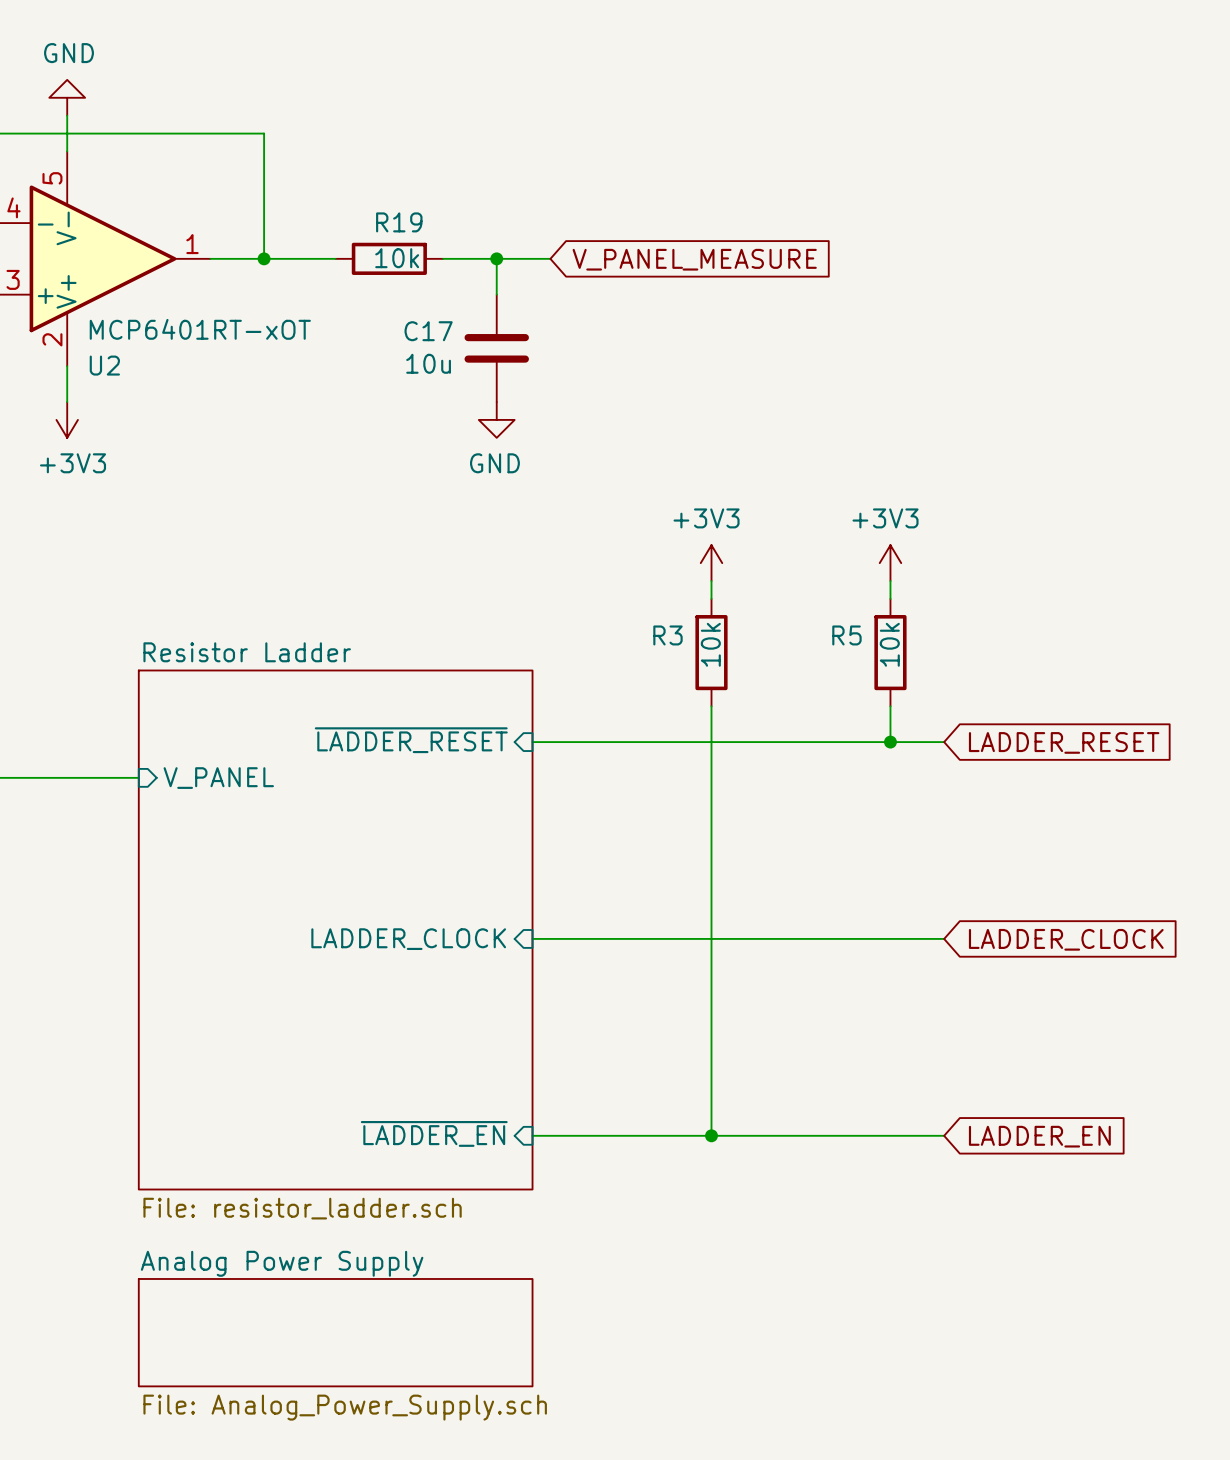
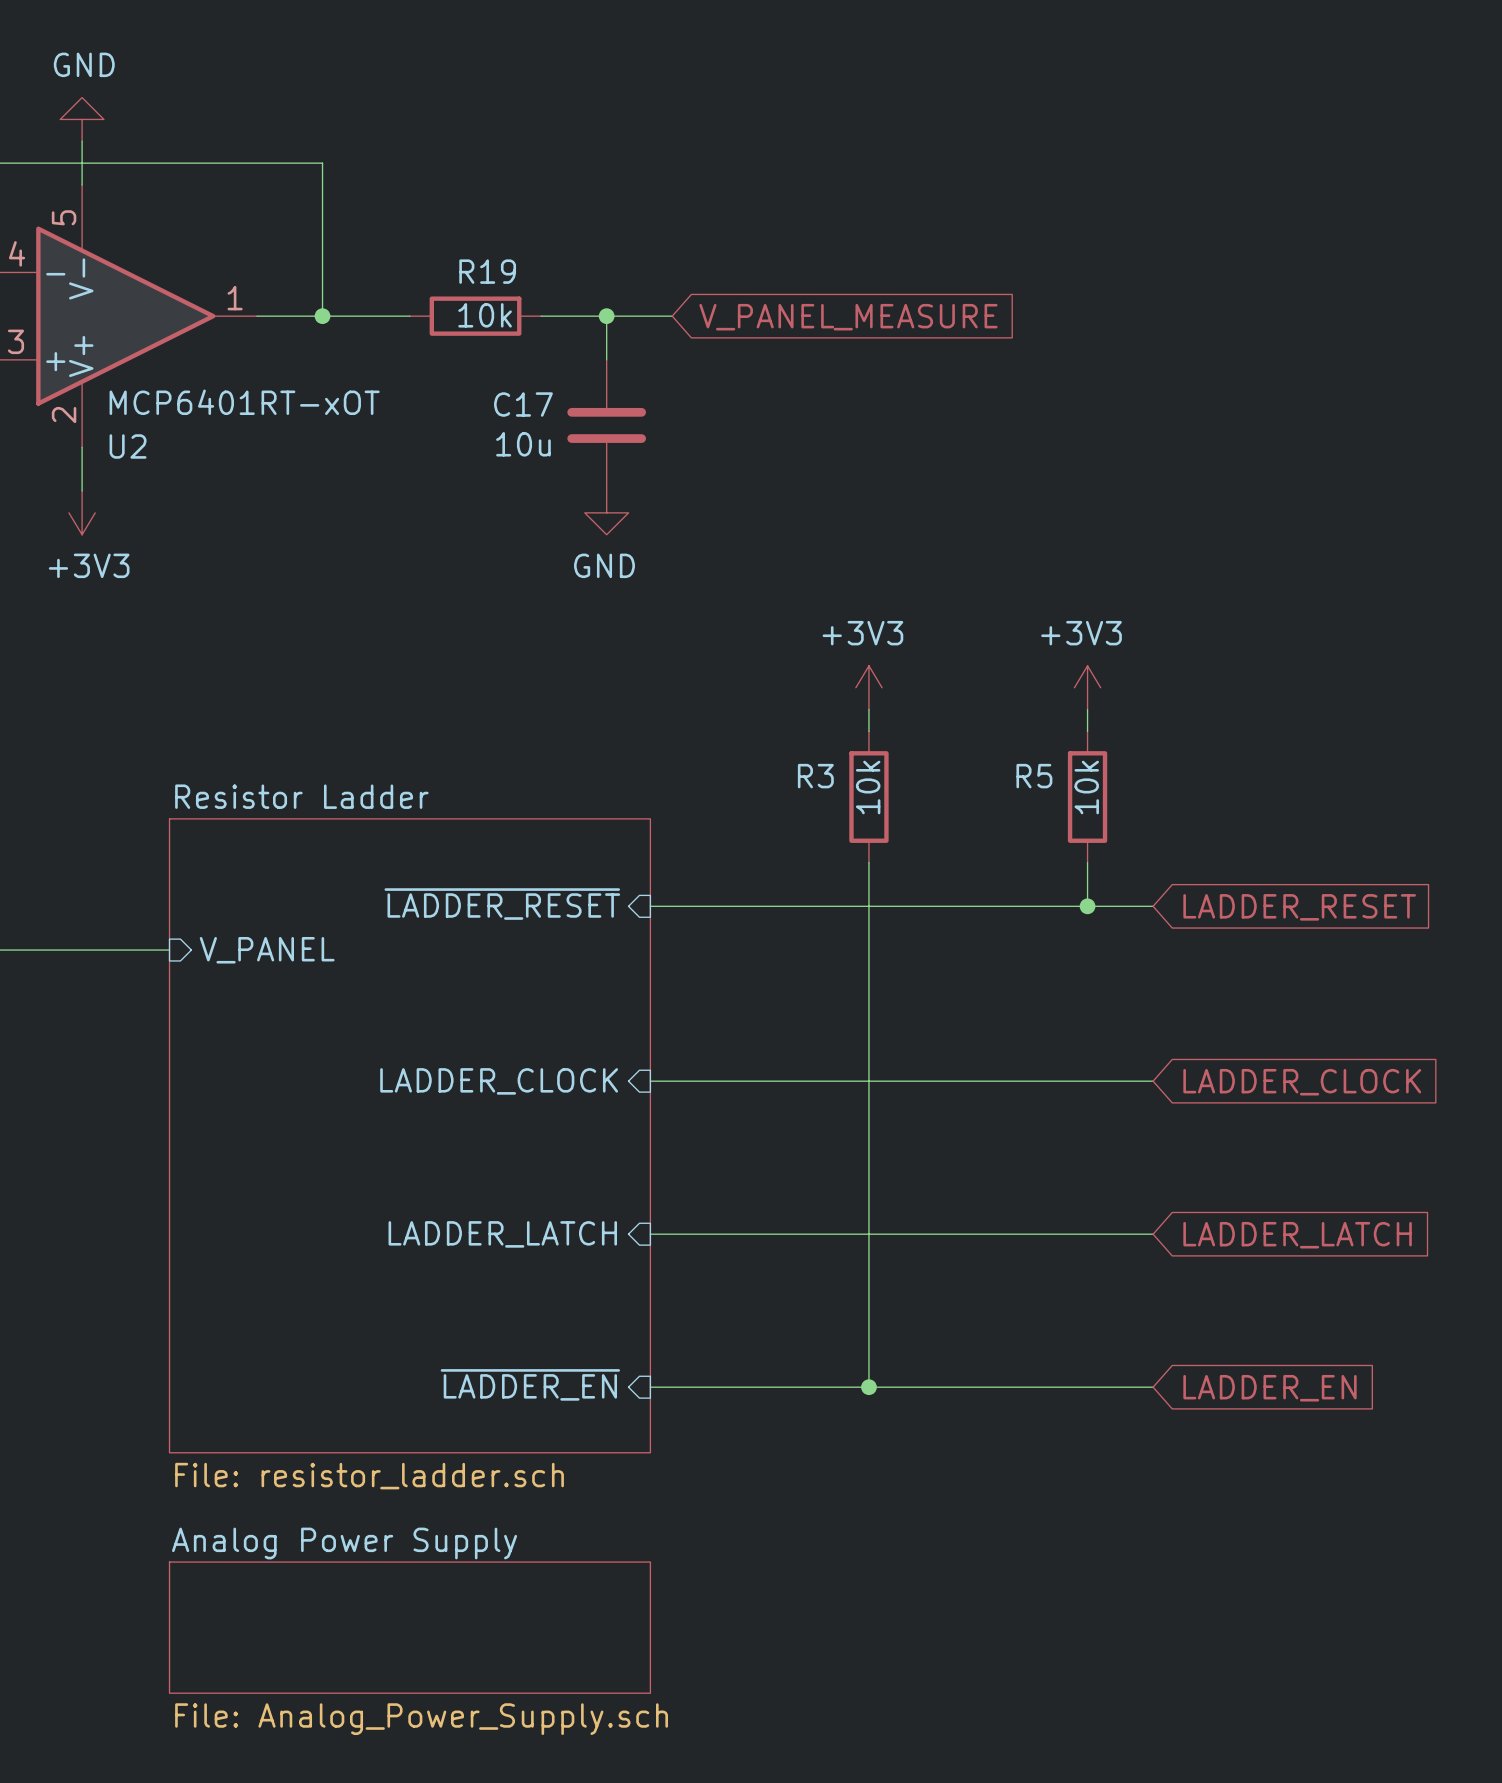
wire: (532, 938) (944, 938) -> (650, 1081) (1153, 1081)
sheet pin position: LADDER_CLOCK (408, 939) -> LADDER_CLOCK (499, 1081)
global label position: LADDER_CLOCK (1066, 939) -> LADDER_CLOCK (1302, 1082)
sheet pin: none -> LADDER_LATCH (502, 1234)
wire: none -> (650, 1234) (1153, 1234)
global label: none -> LADDER_LATCH (1297, 1235)

